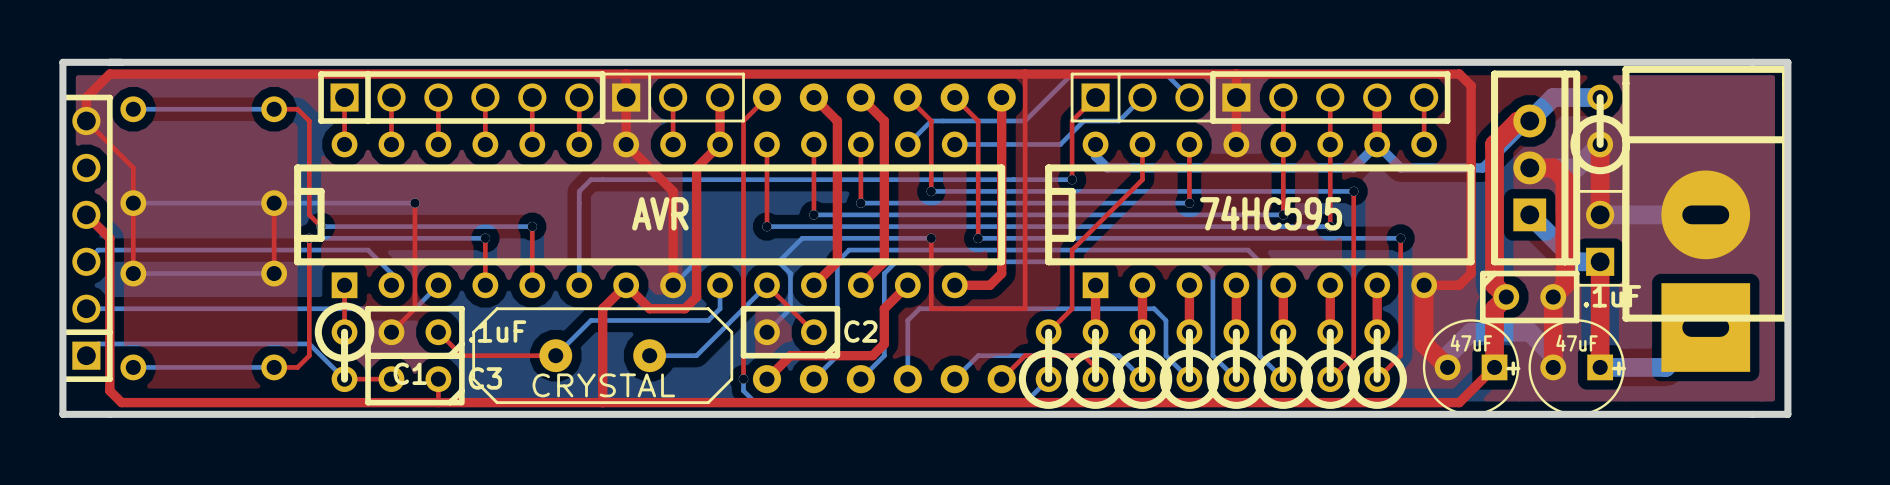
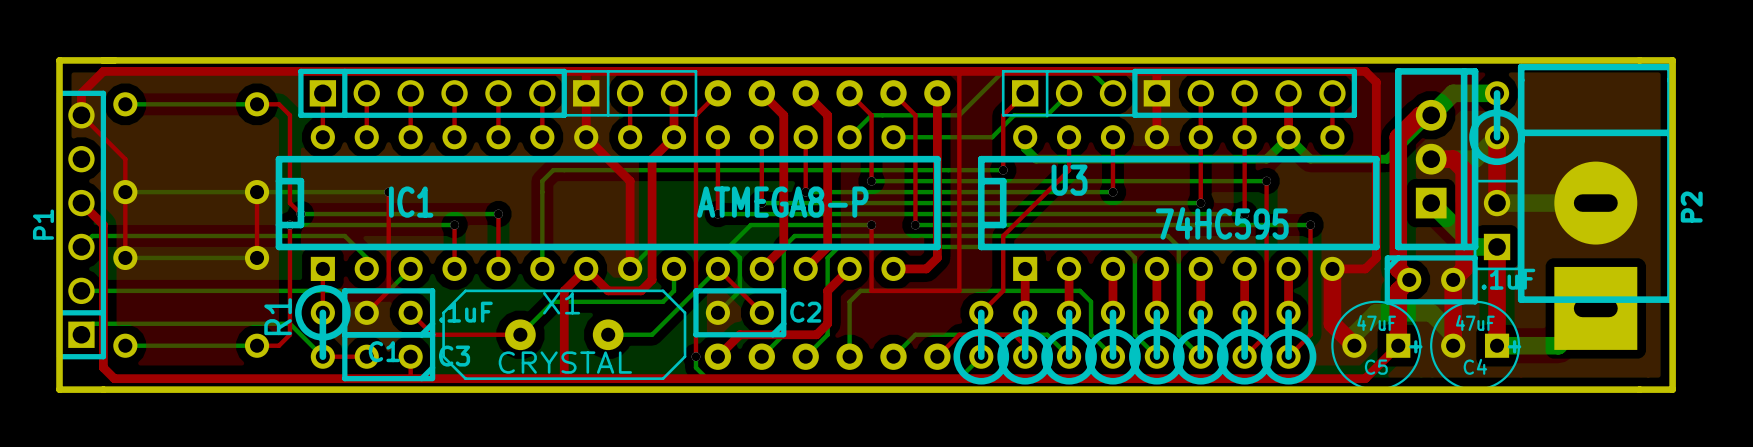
U3 name: none -> U3 (1069, 180)
IC1 name: none -> IC1 (411, 202)
IC1 value: AVR (660, 213) -> ATMEGA8-P (782, 202)
U3 value position: 74HC595 (1271, 213) -> 74HC595 (1222, 223)
P2 name: none -> P2 (1691, 207)
P1 name: none -> P1 (43, 224)
X1 name: none -> X1 (561, 303)
R1 name: none -> R1 (278, 316)
C4 name: none -> C4 (1475, 366)
C5 name: none -> C5 (1376, 367)

